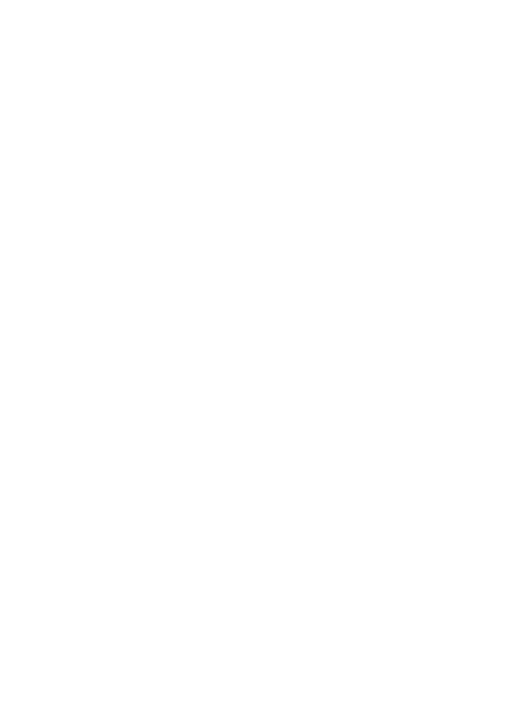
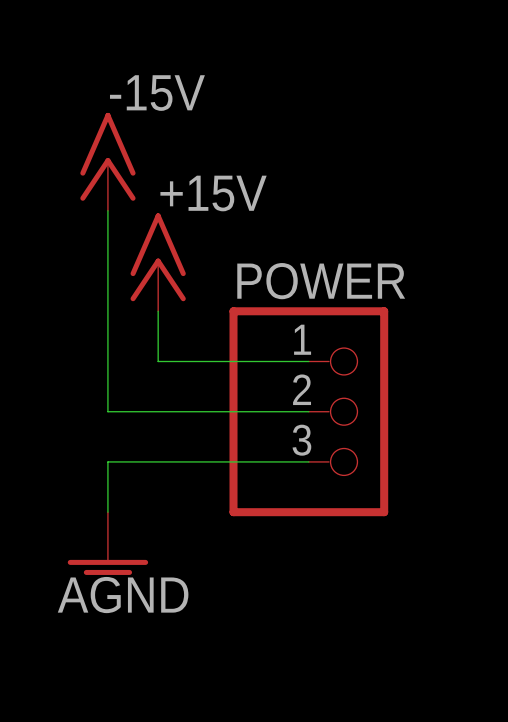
power symbol: none -> -15V (107, 161)
wire: none -> (107, 210) (107, 411) (308, 411)
power symbol: none -> +15V (158, 262)
wire: none -> (158, 311) (158, 361) (308, 361)
POWER: none -> (308, 411)
wire: none -> (308, 461) (107, 461) (107, 512)
power symbol: none -> AGND (107, 543)

